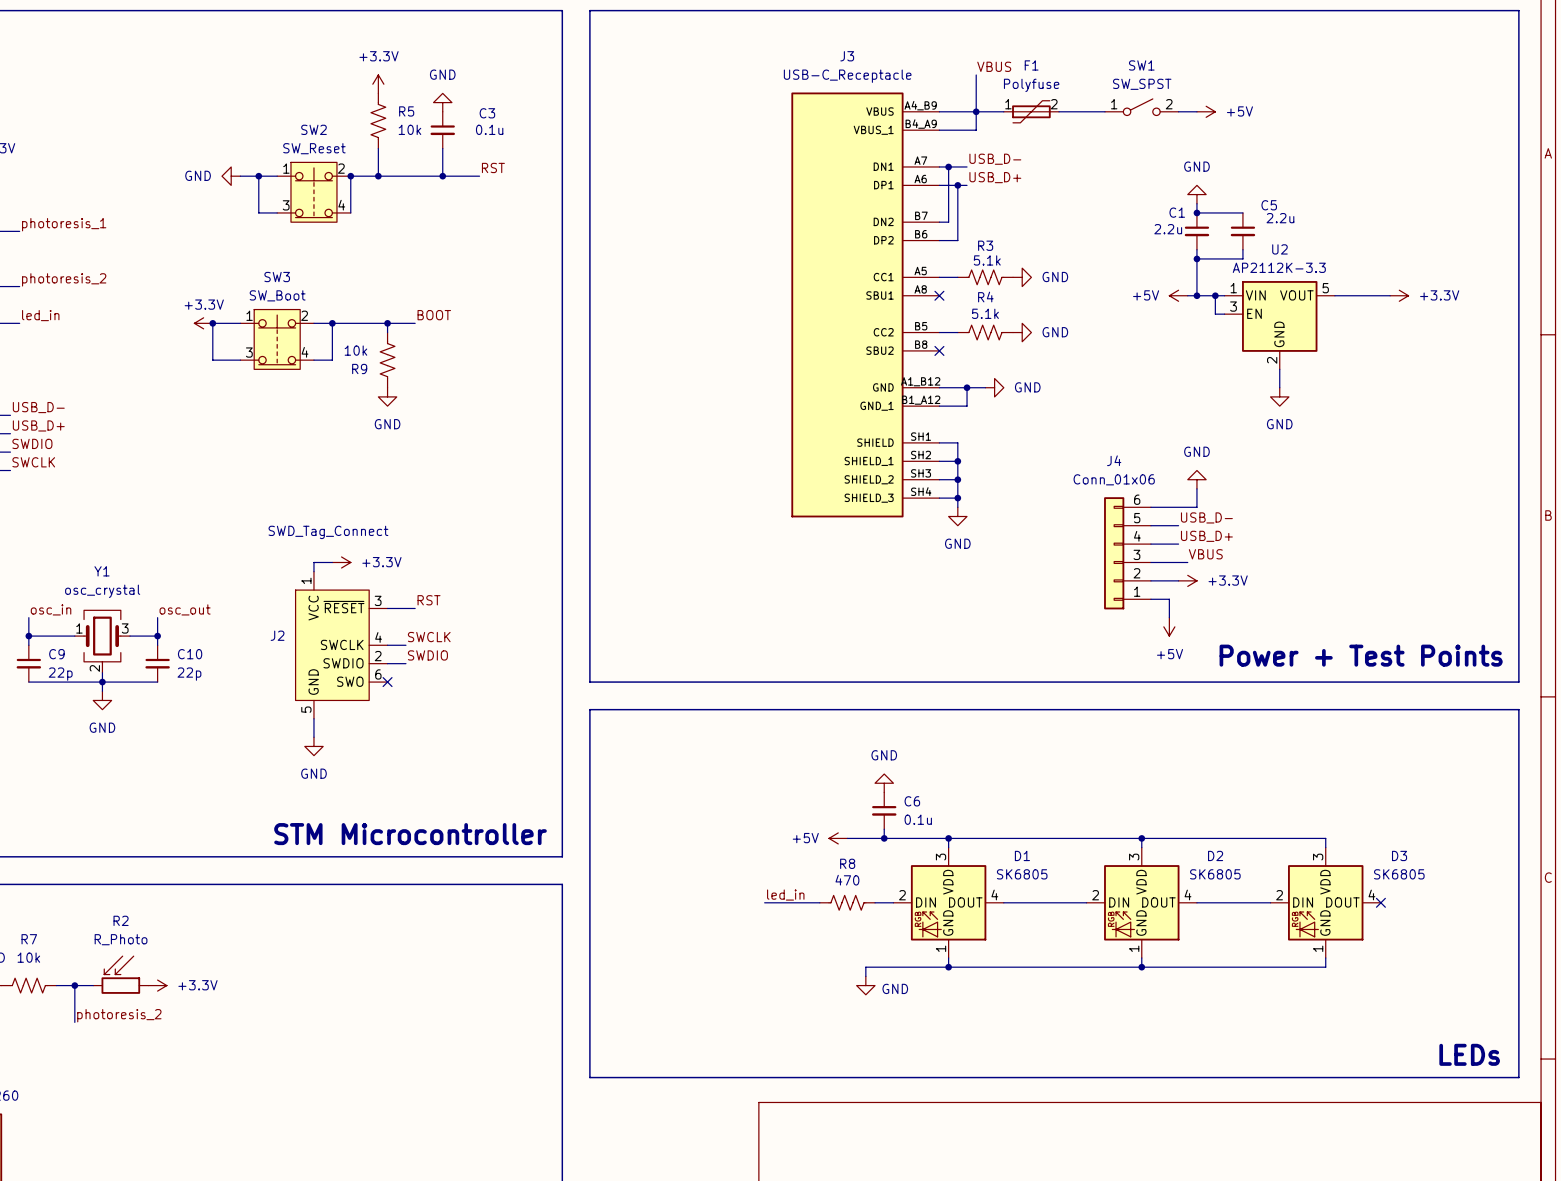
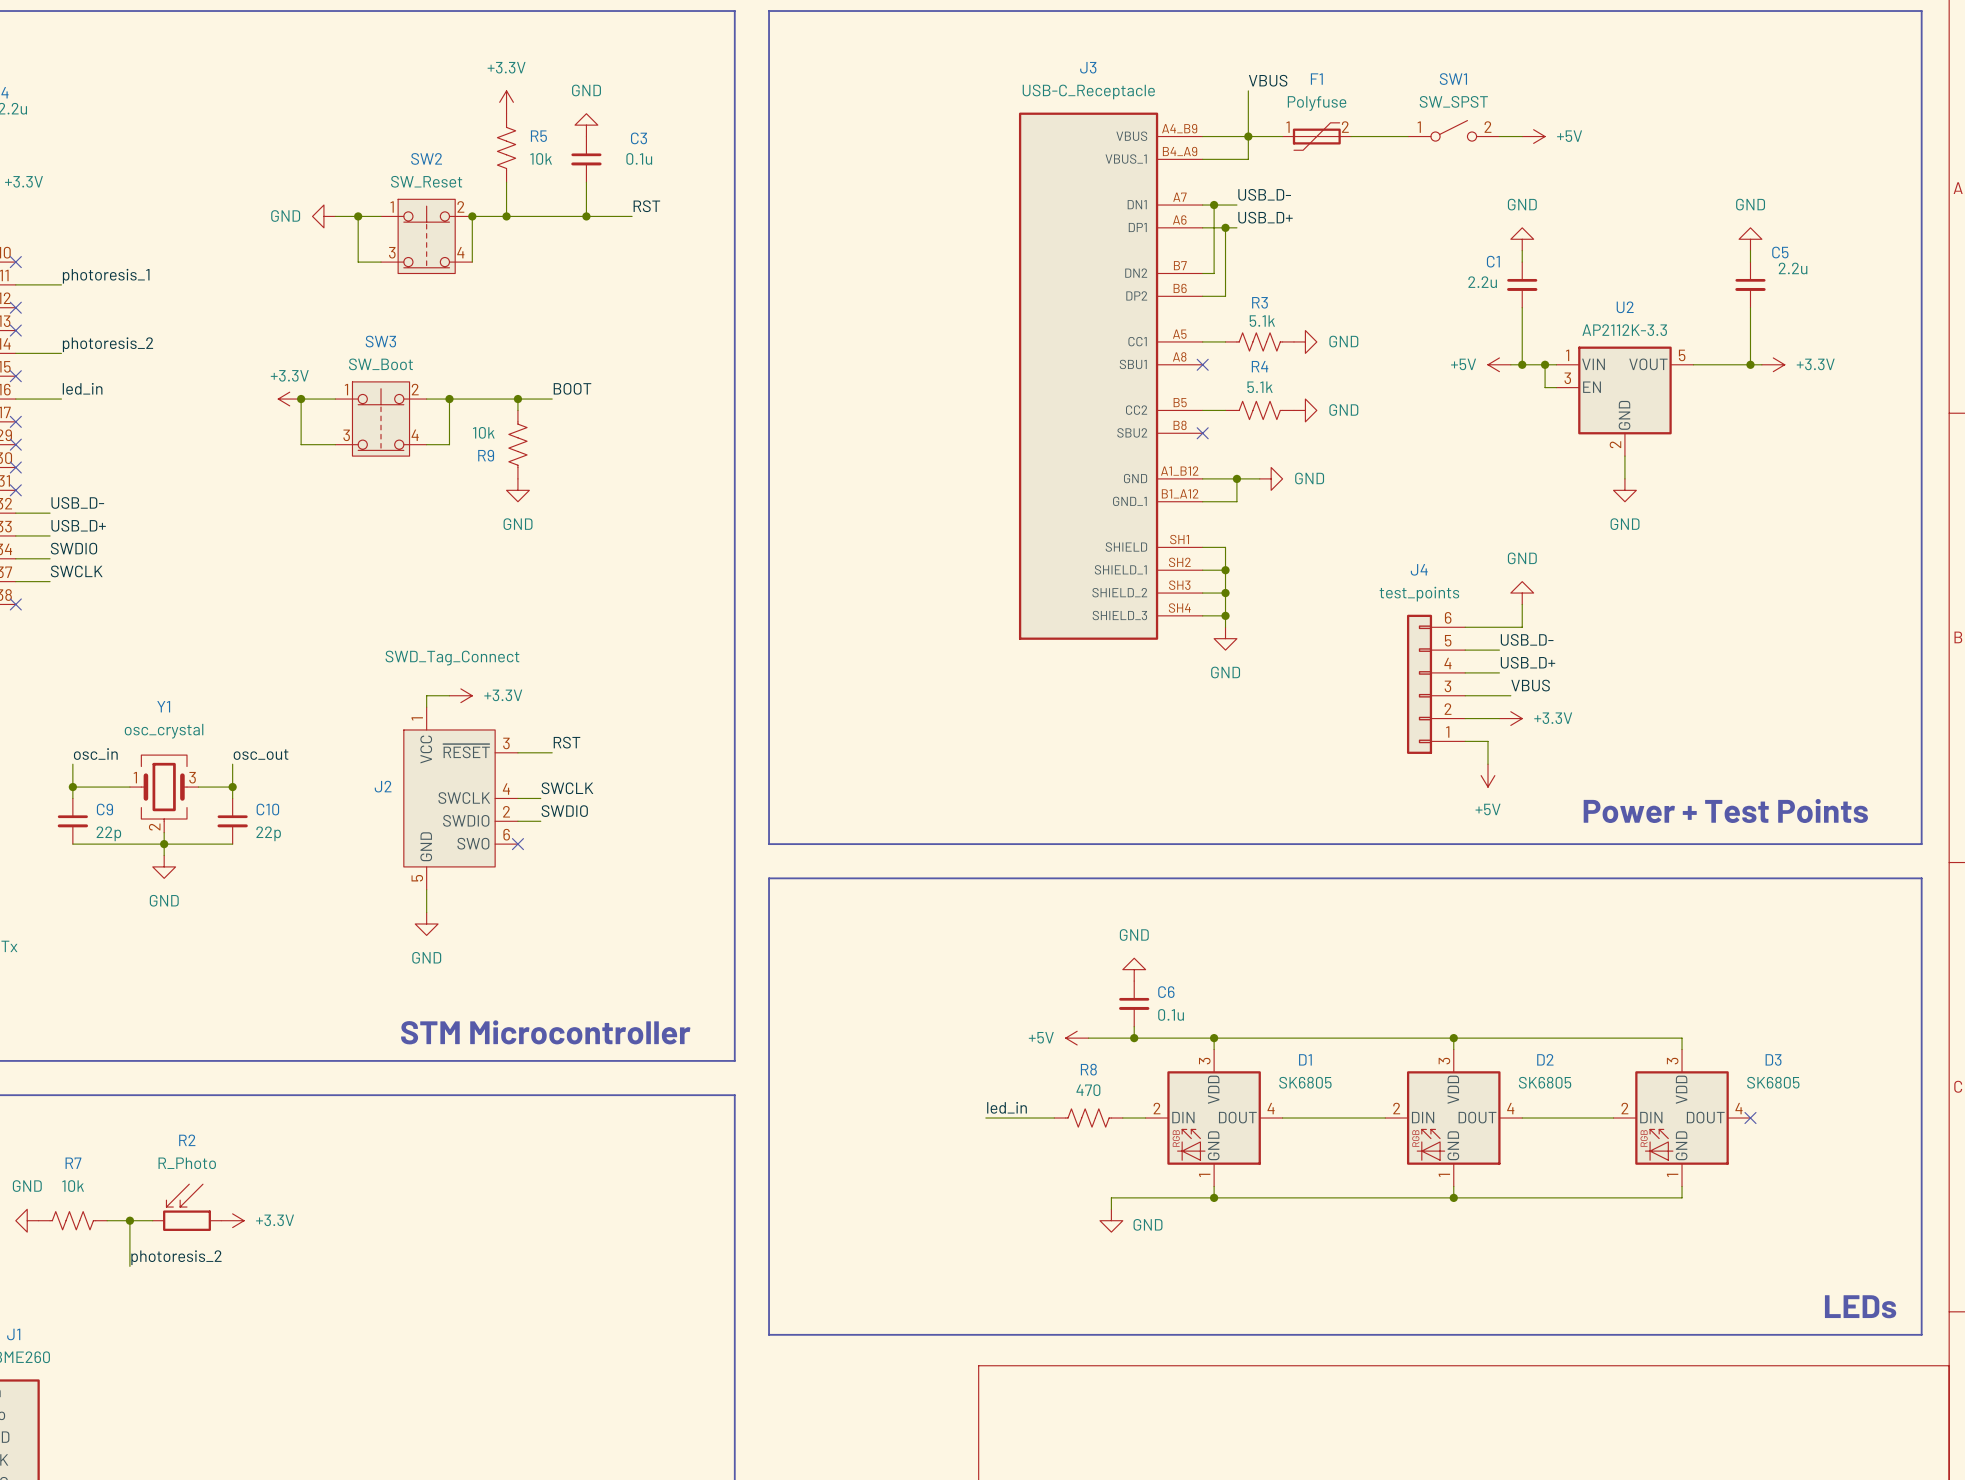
power symbol: none -> GND (1750, 239)
wire: none -> (1750, 250) (1750, 262)
wire: (1196, 212) (1242, 212) -> none
junction: (1196, 212) -> none
C5 position: (1242, 231) -> (1750, 284)
wire: (1242, 249) (1242, 258) (1196, 258) -> none
wire: none -> (1750, 307) (1750, 364)
junction: (1196, 258) -> none
junction: none -> (1750, 364)
J4 value: Conn_01x06 (1114, 479) -> test_points (1419, 594)

